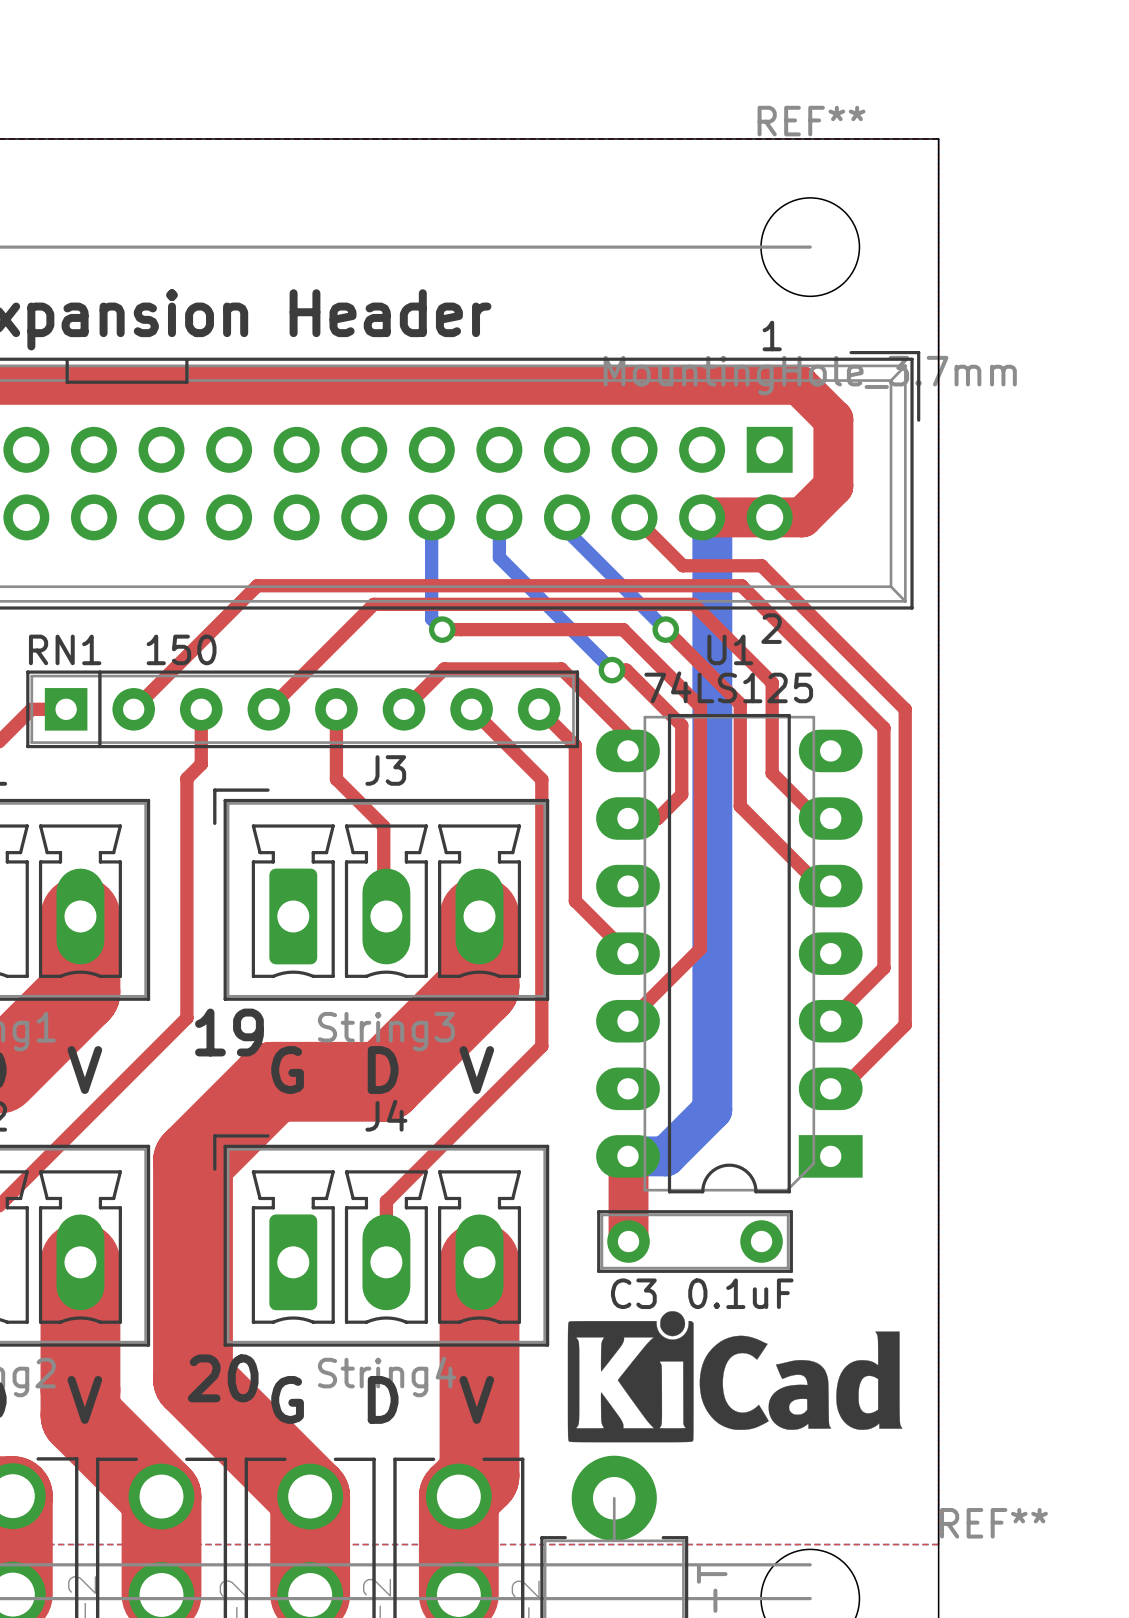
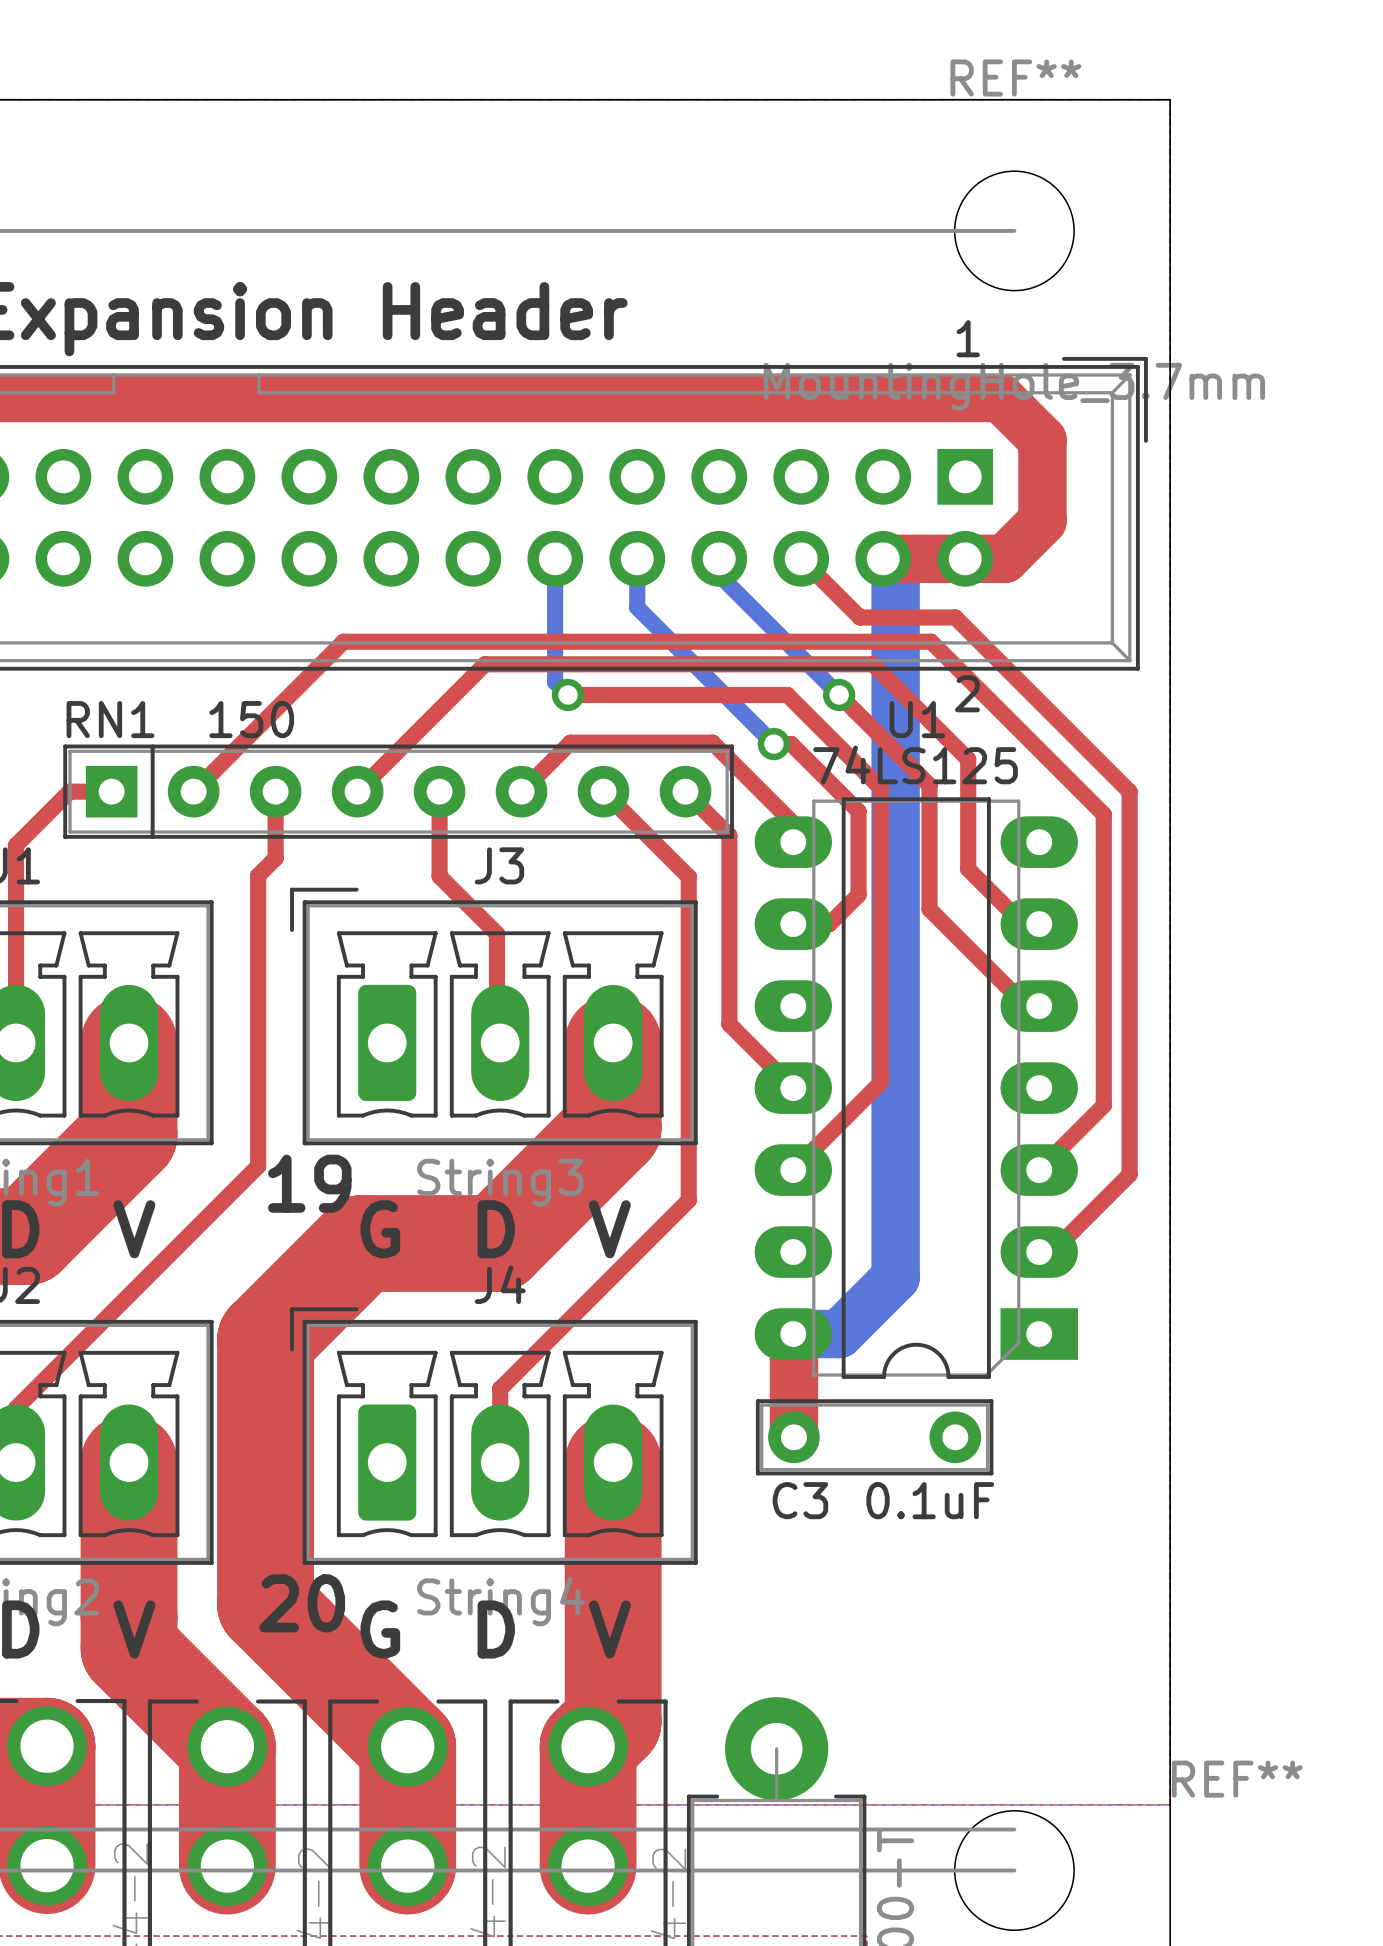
line: (67, 360) (67, 382) (186, 382) (186, 360) -> none
drawing: [567, 1311, 903, 1443] -> none

